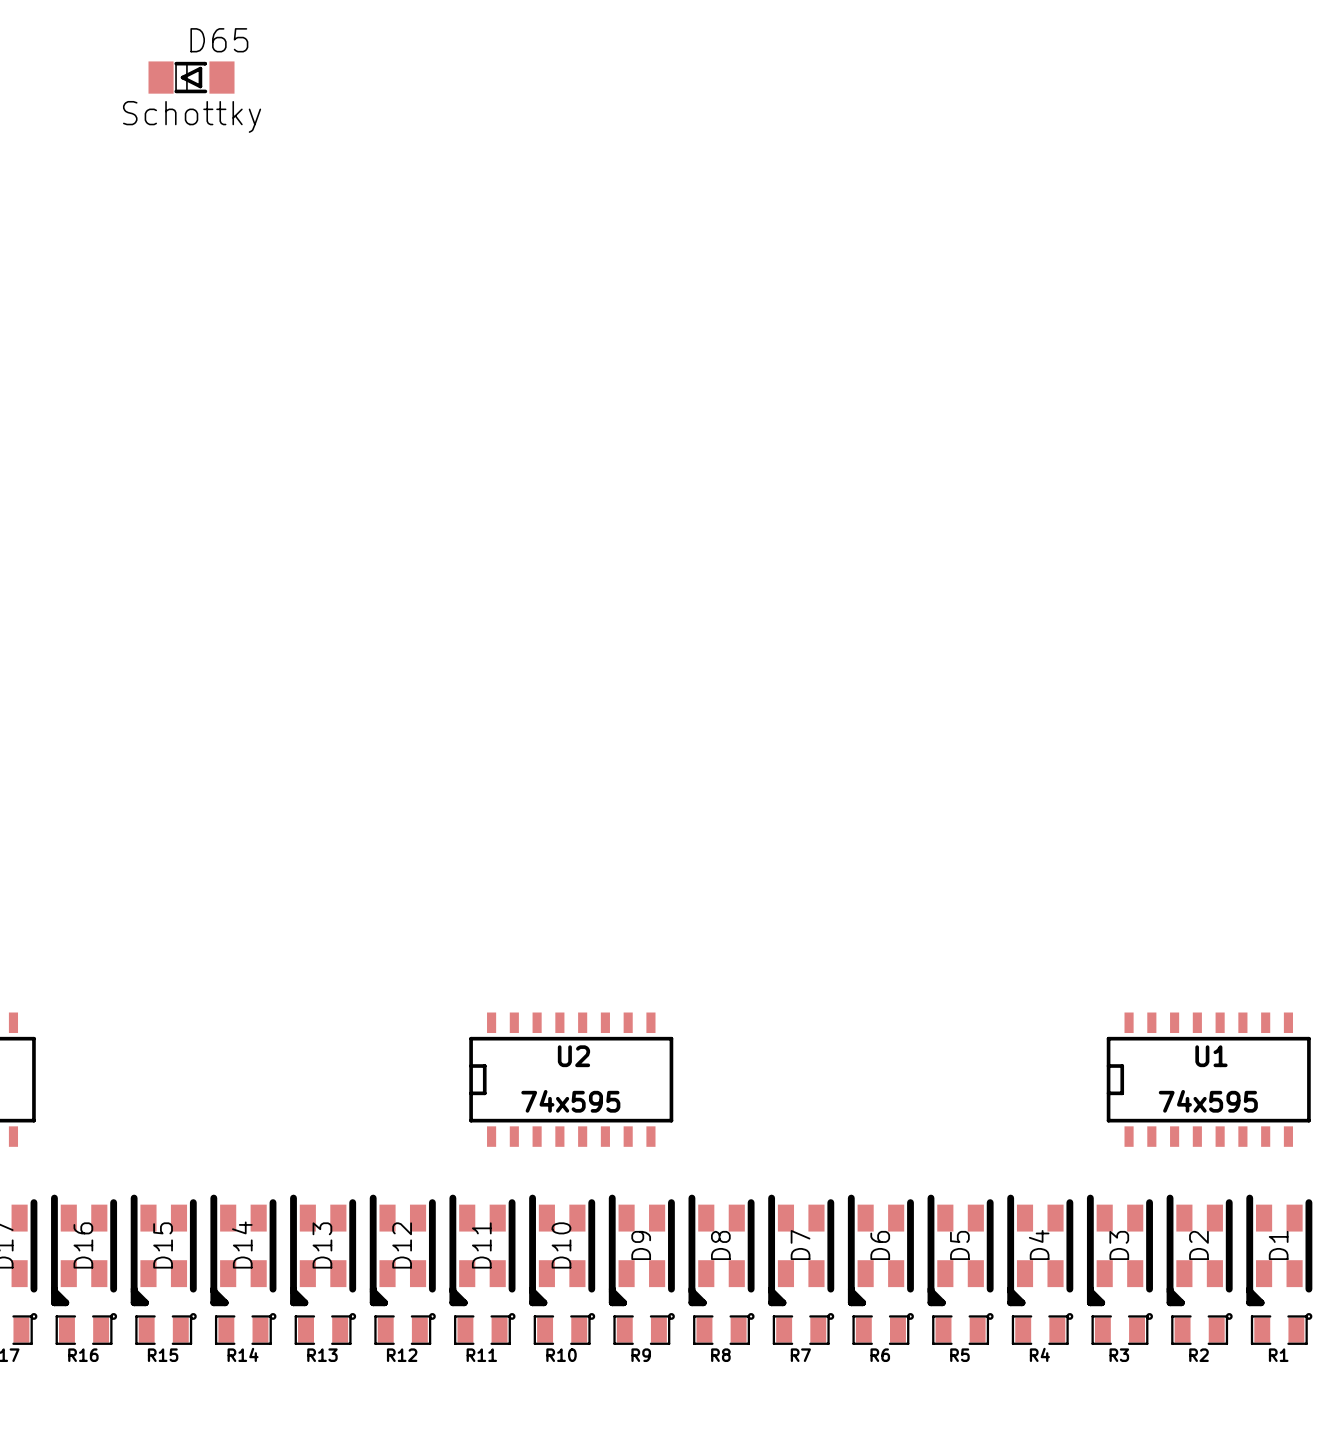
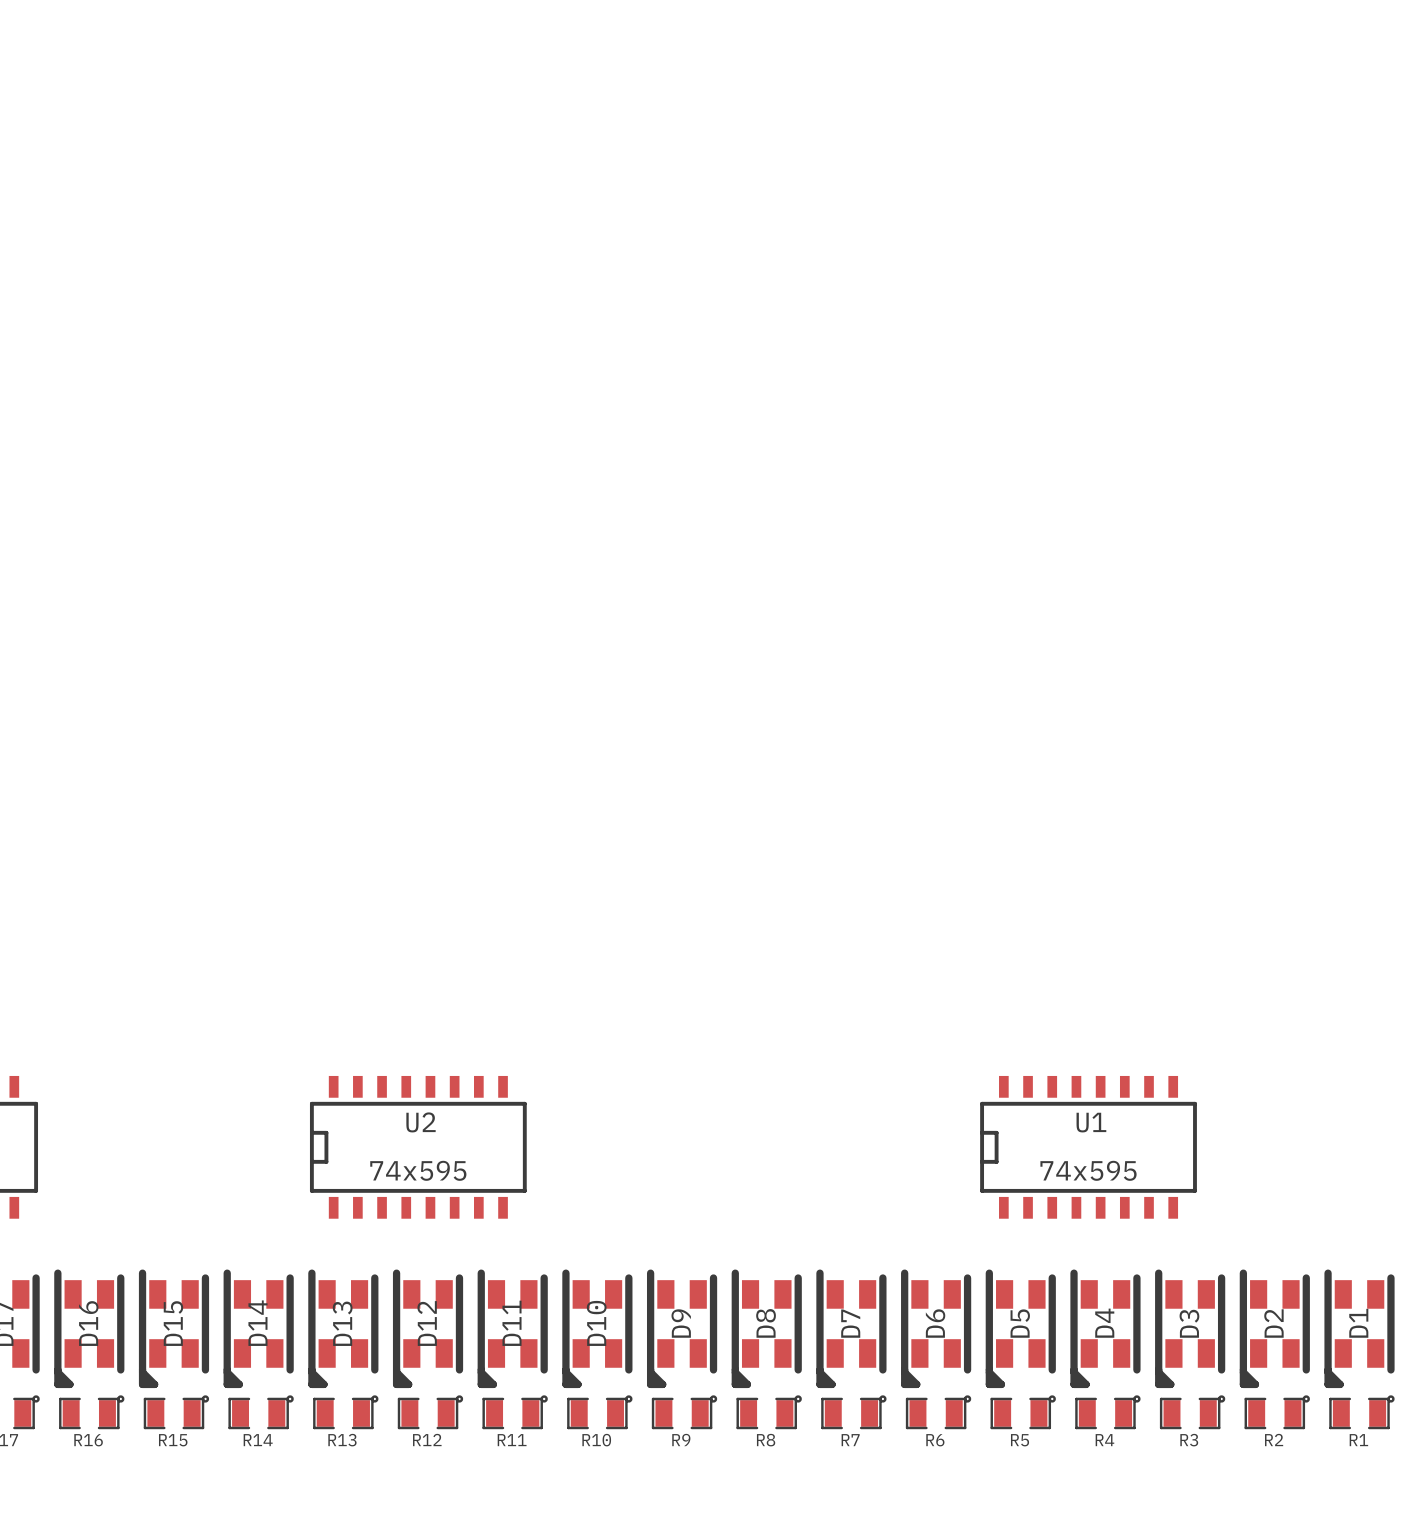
D65: Schottky (191, 77) -> none
U2 position: (571, 1079) -> (418, 1147)
U1 position: (1208, 1079) -> (1088, 1147)

